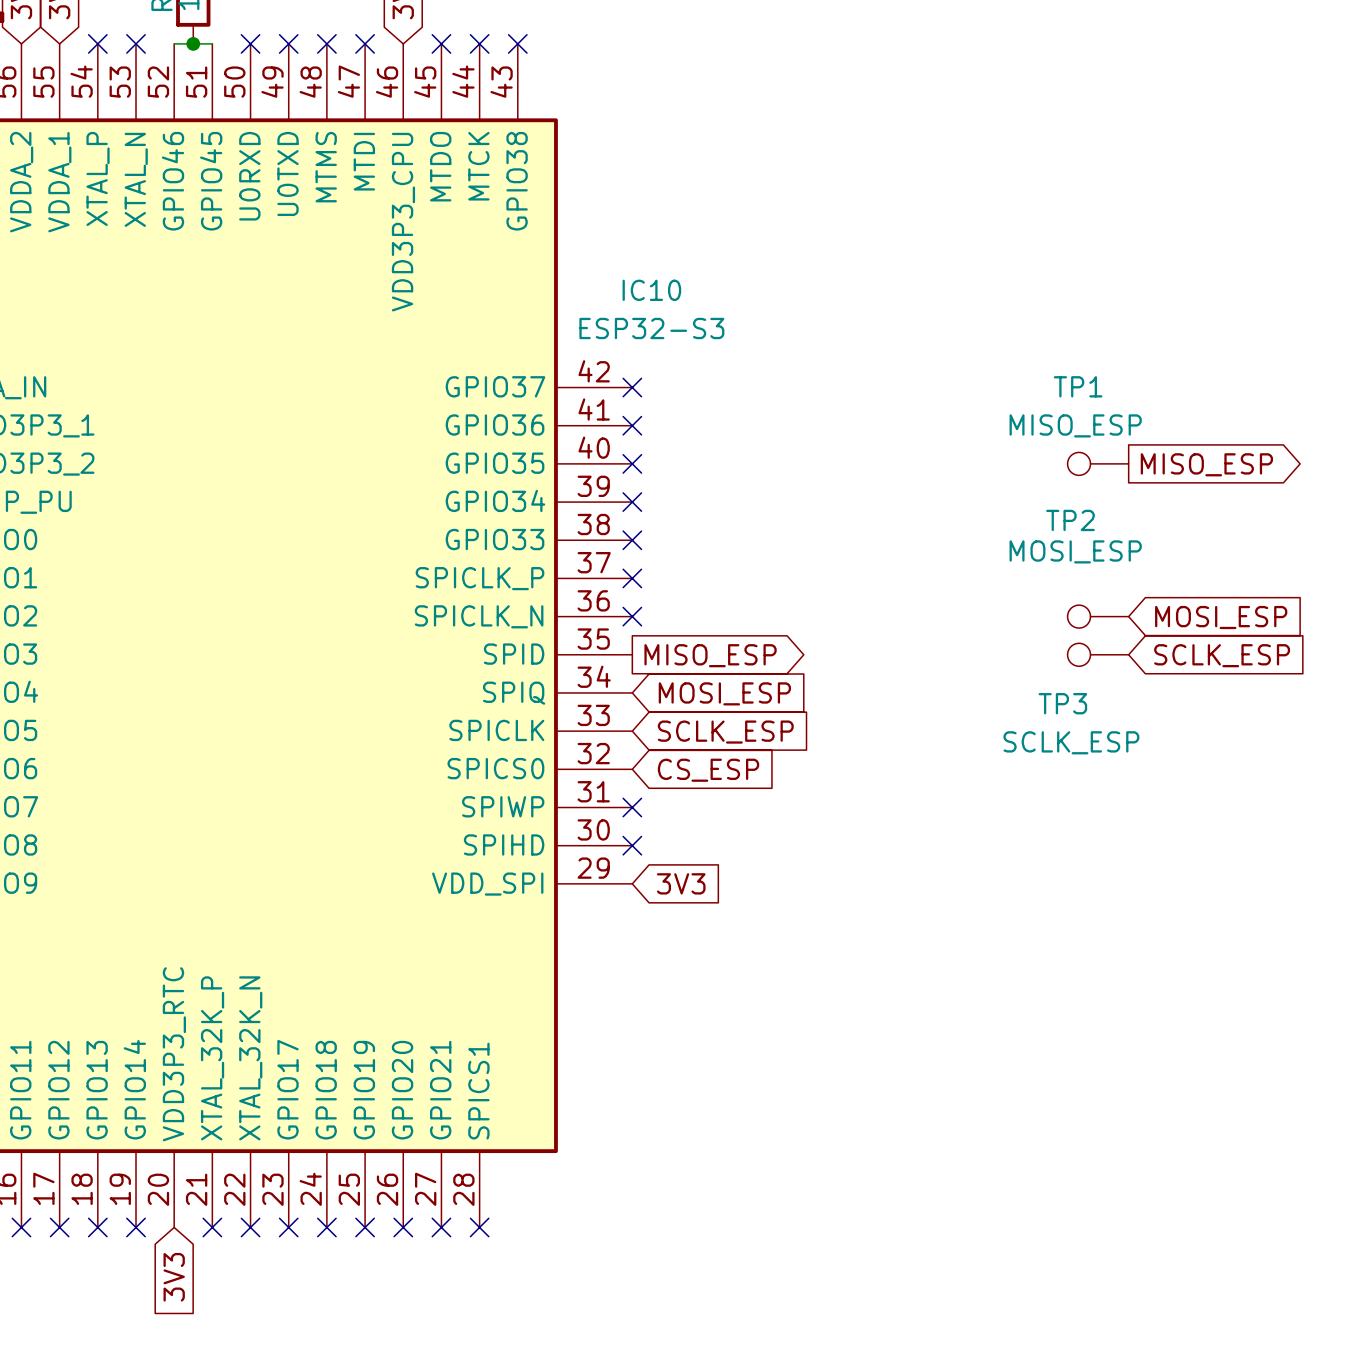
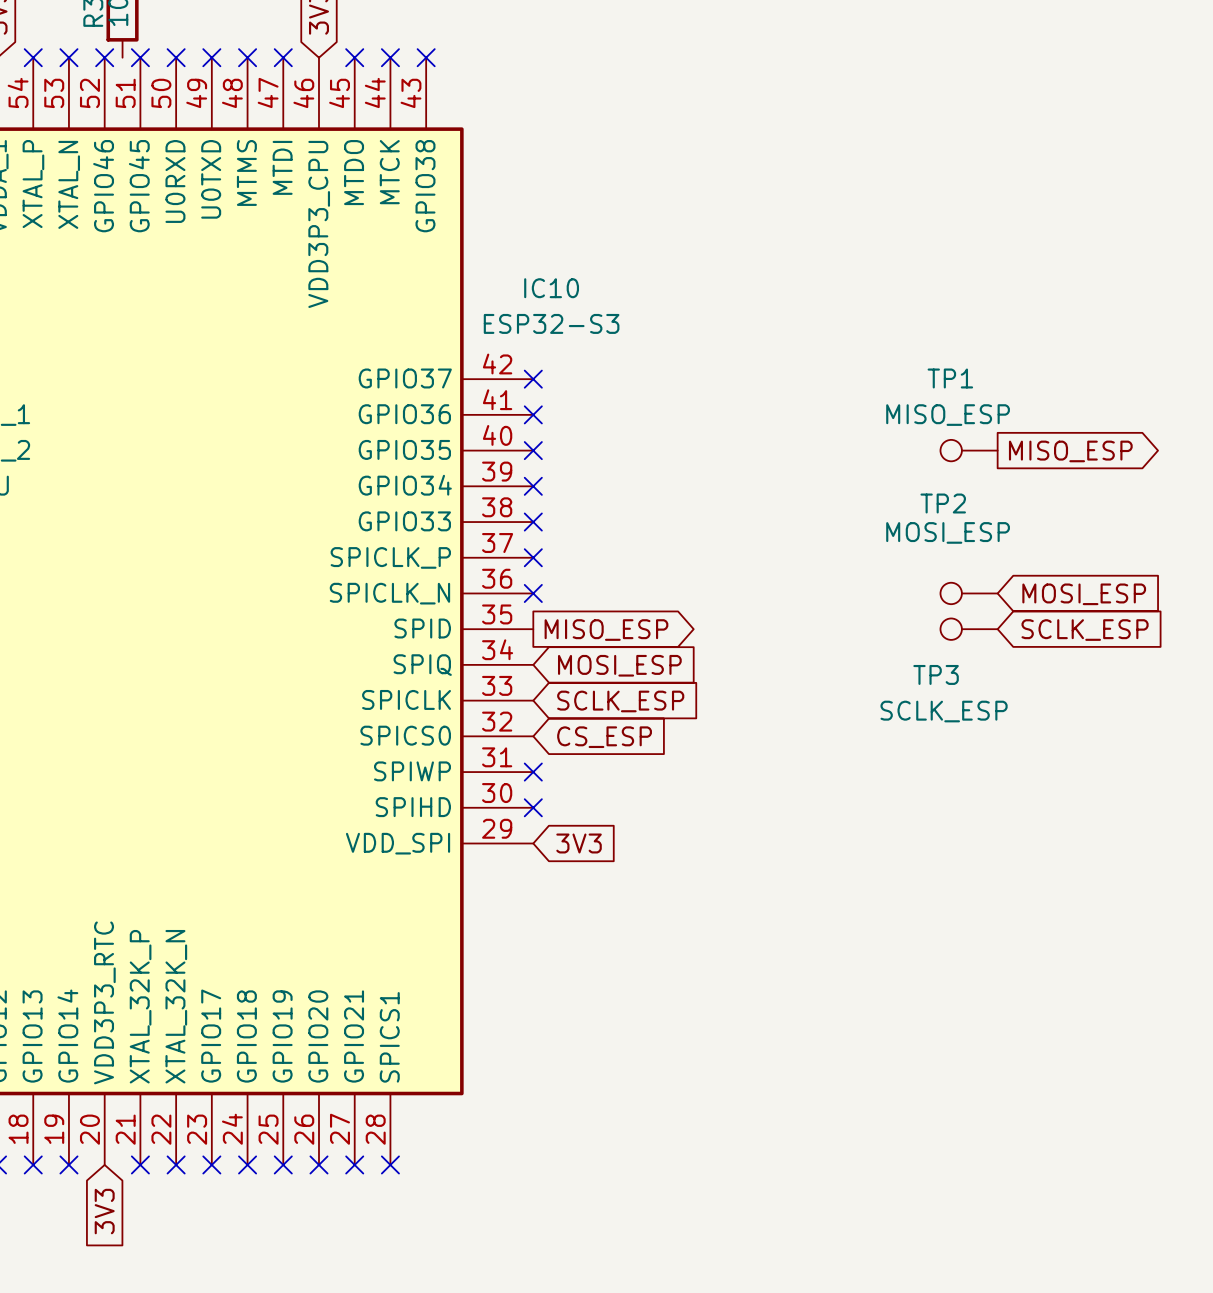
wire: (174, 43) (212, 43) -> none
no-connect mark: none -> (104, 57)
junction: (193, 43) -> none
no-connect mark: none -> (140, 57)

